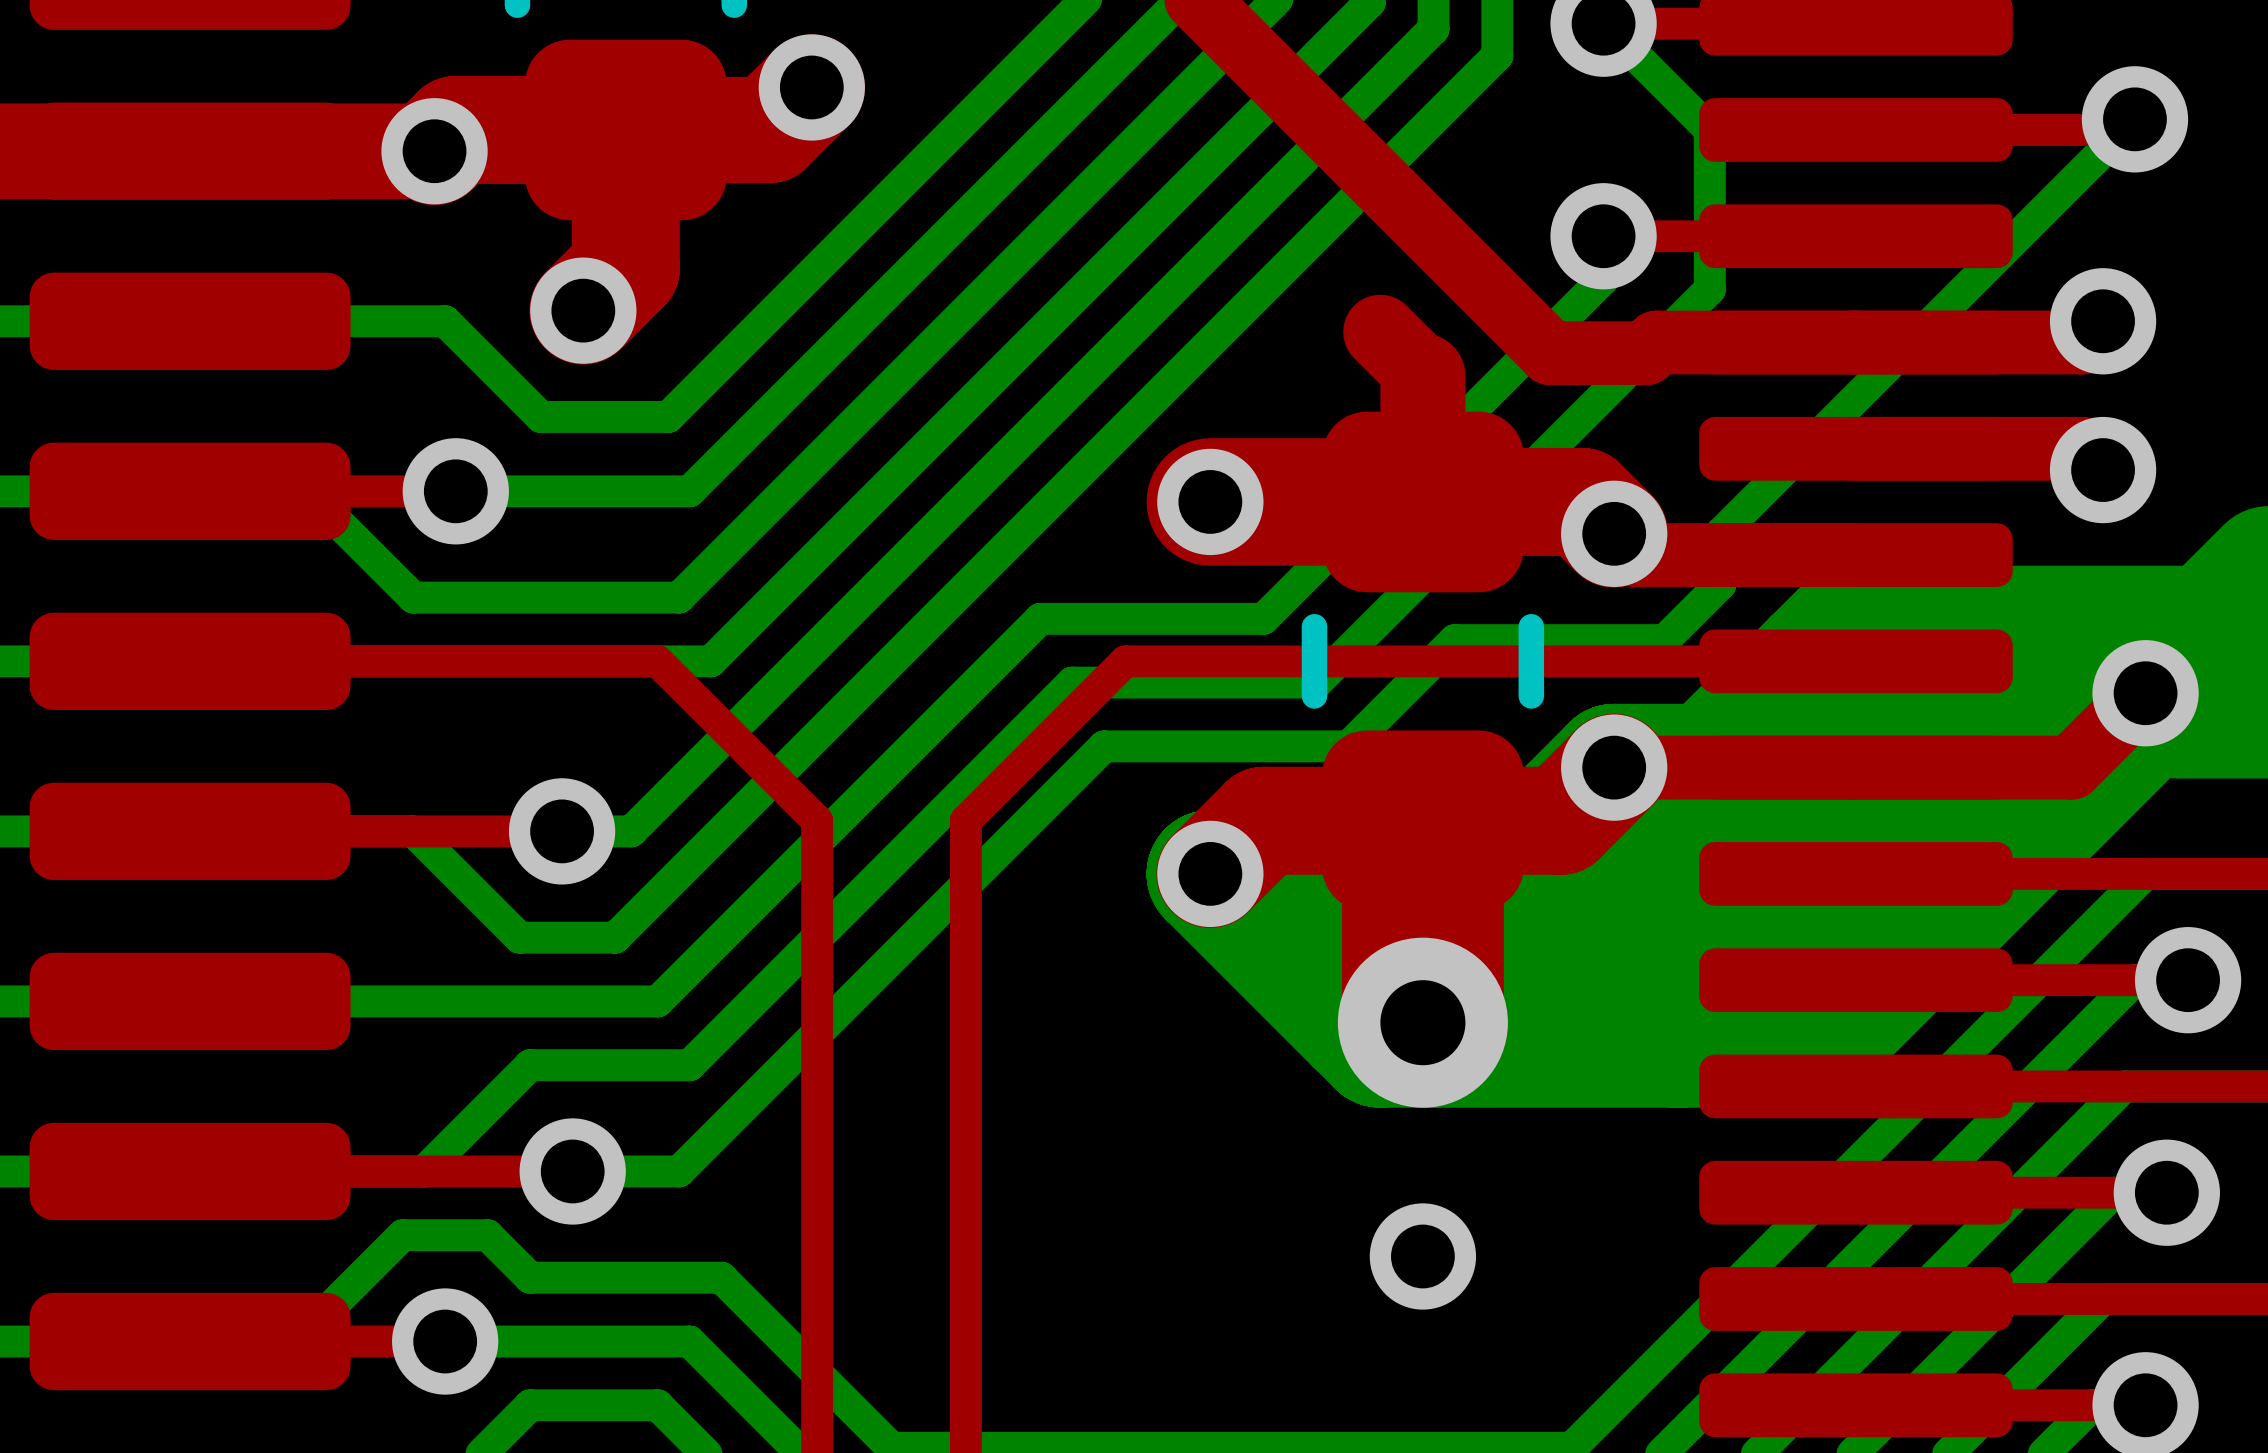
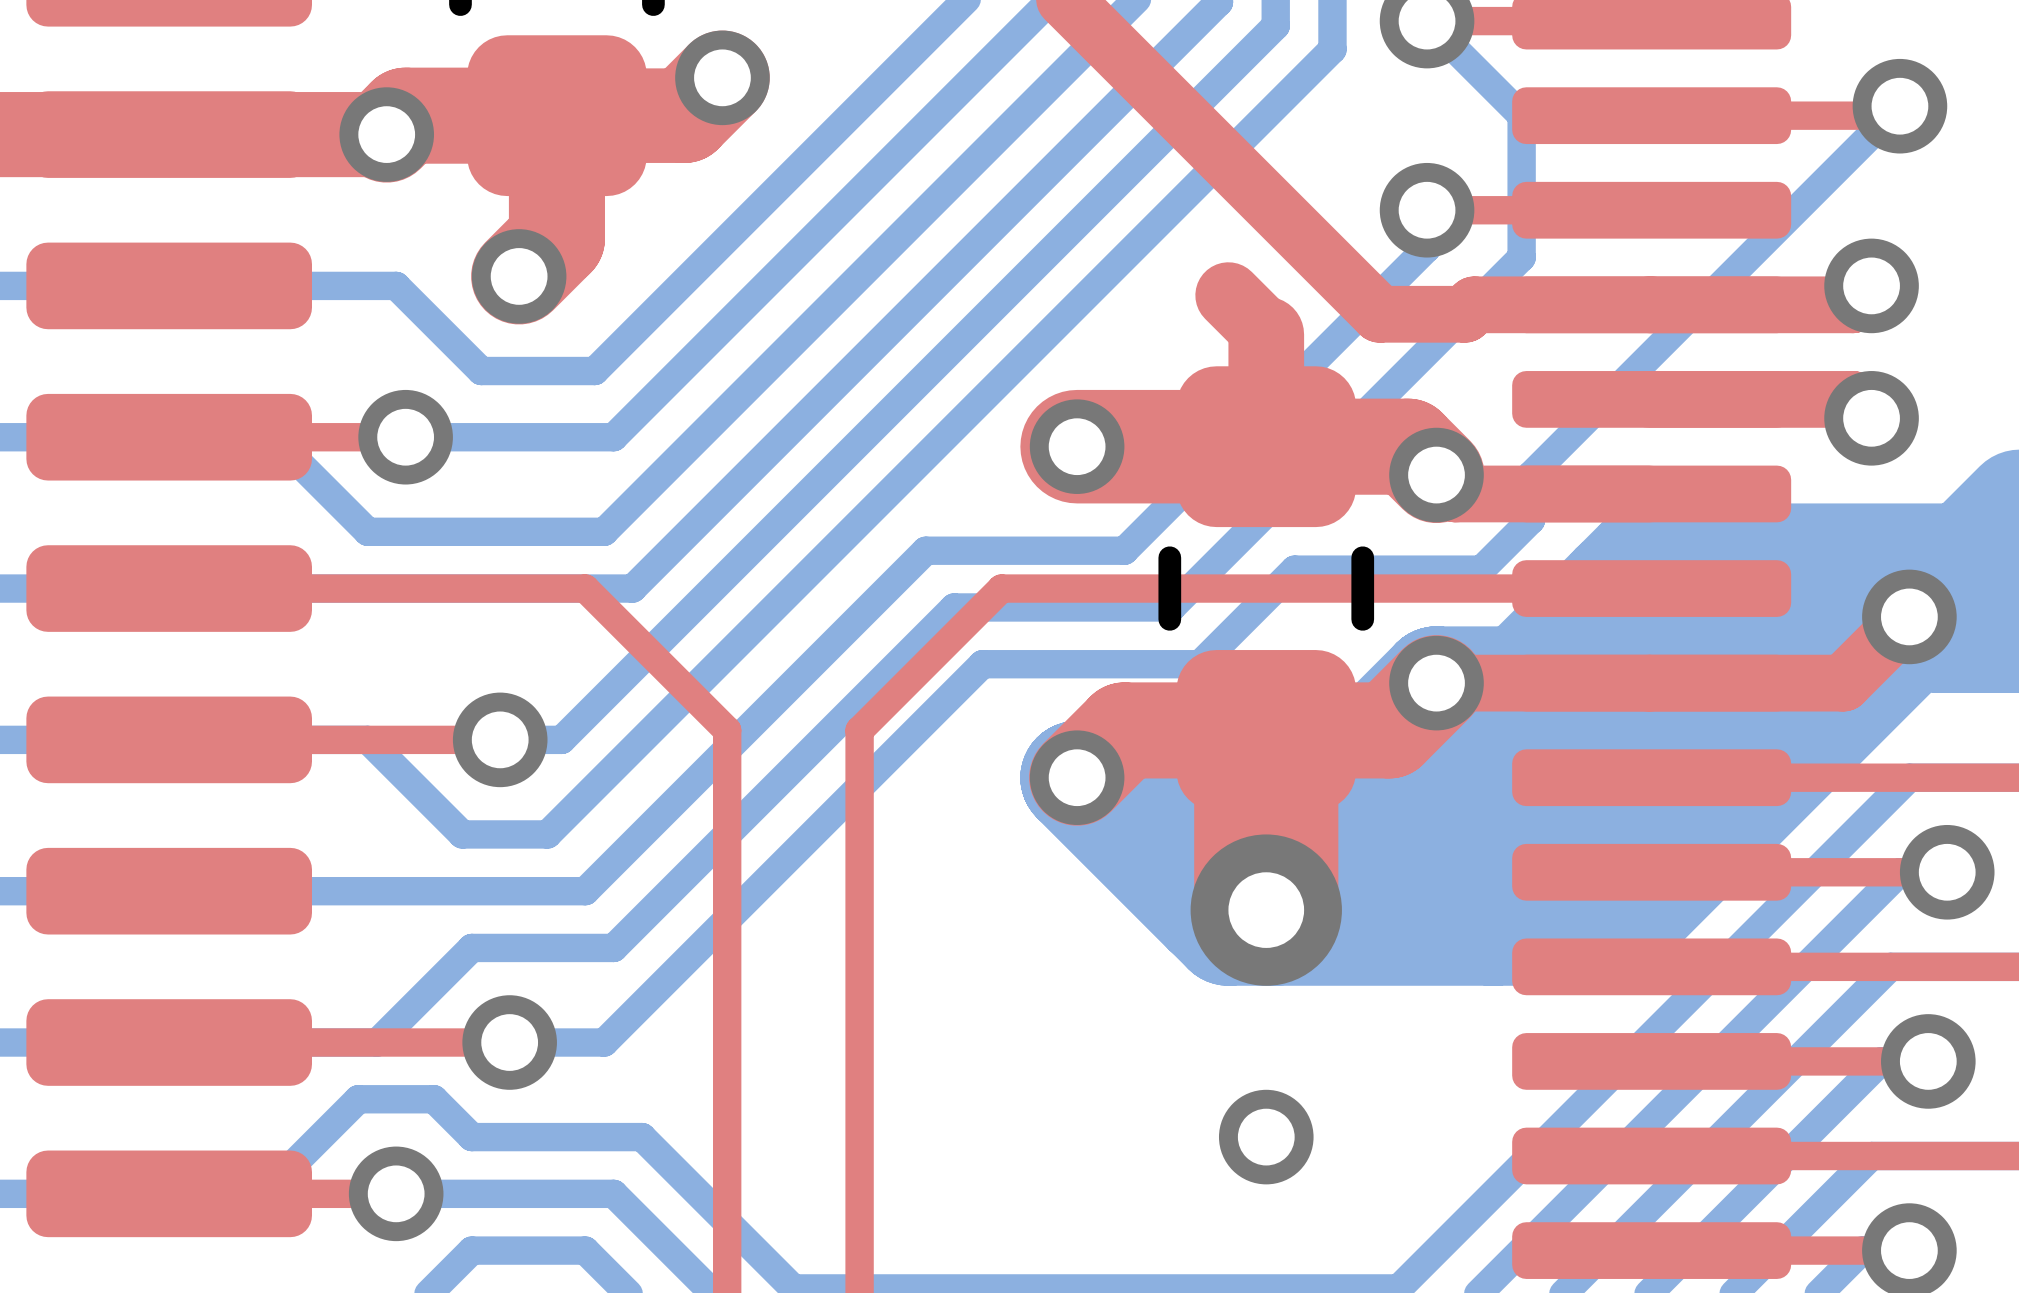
via position: (1422, 1256) -> (1266, 1137)

